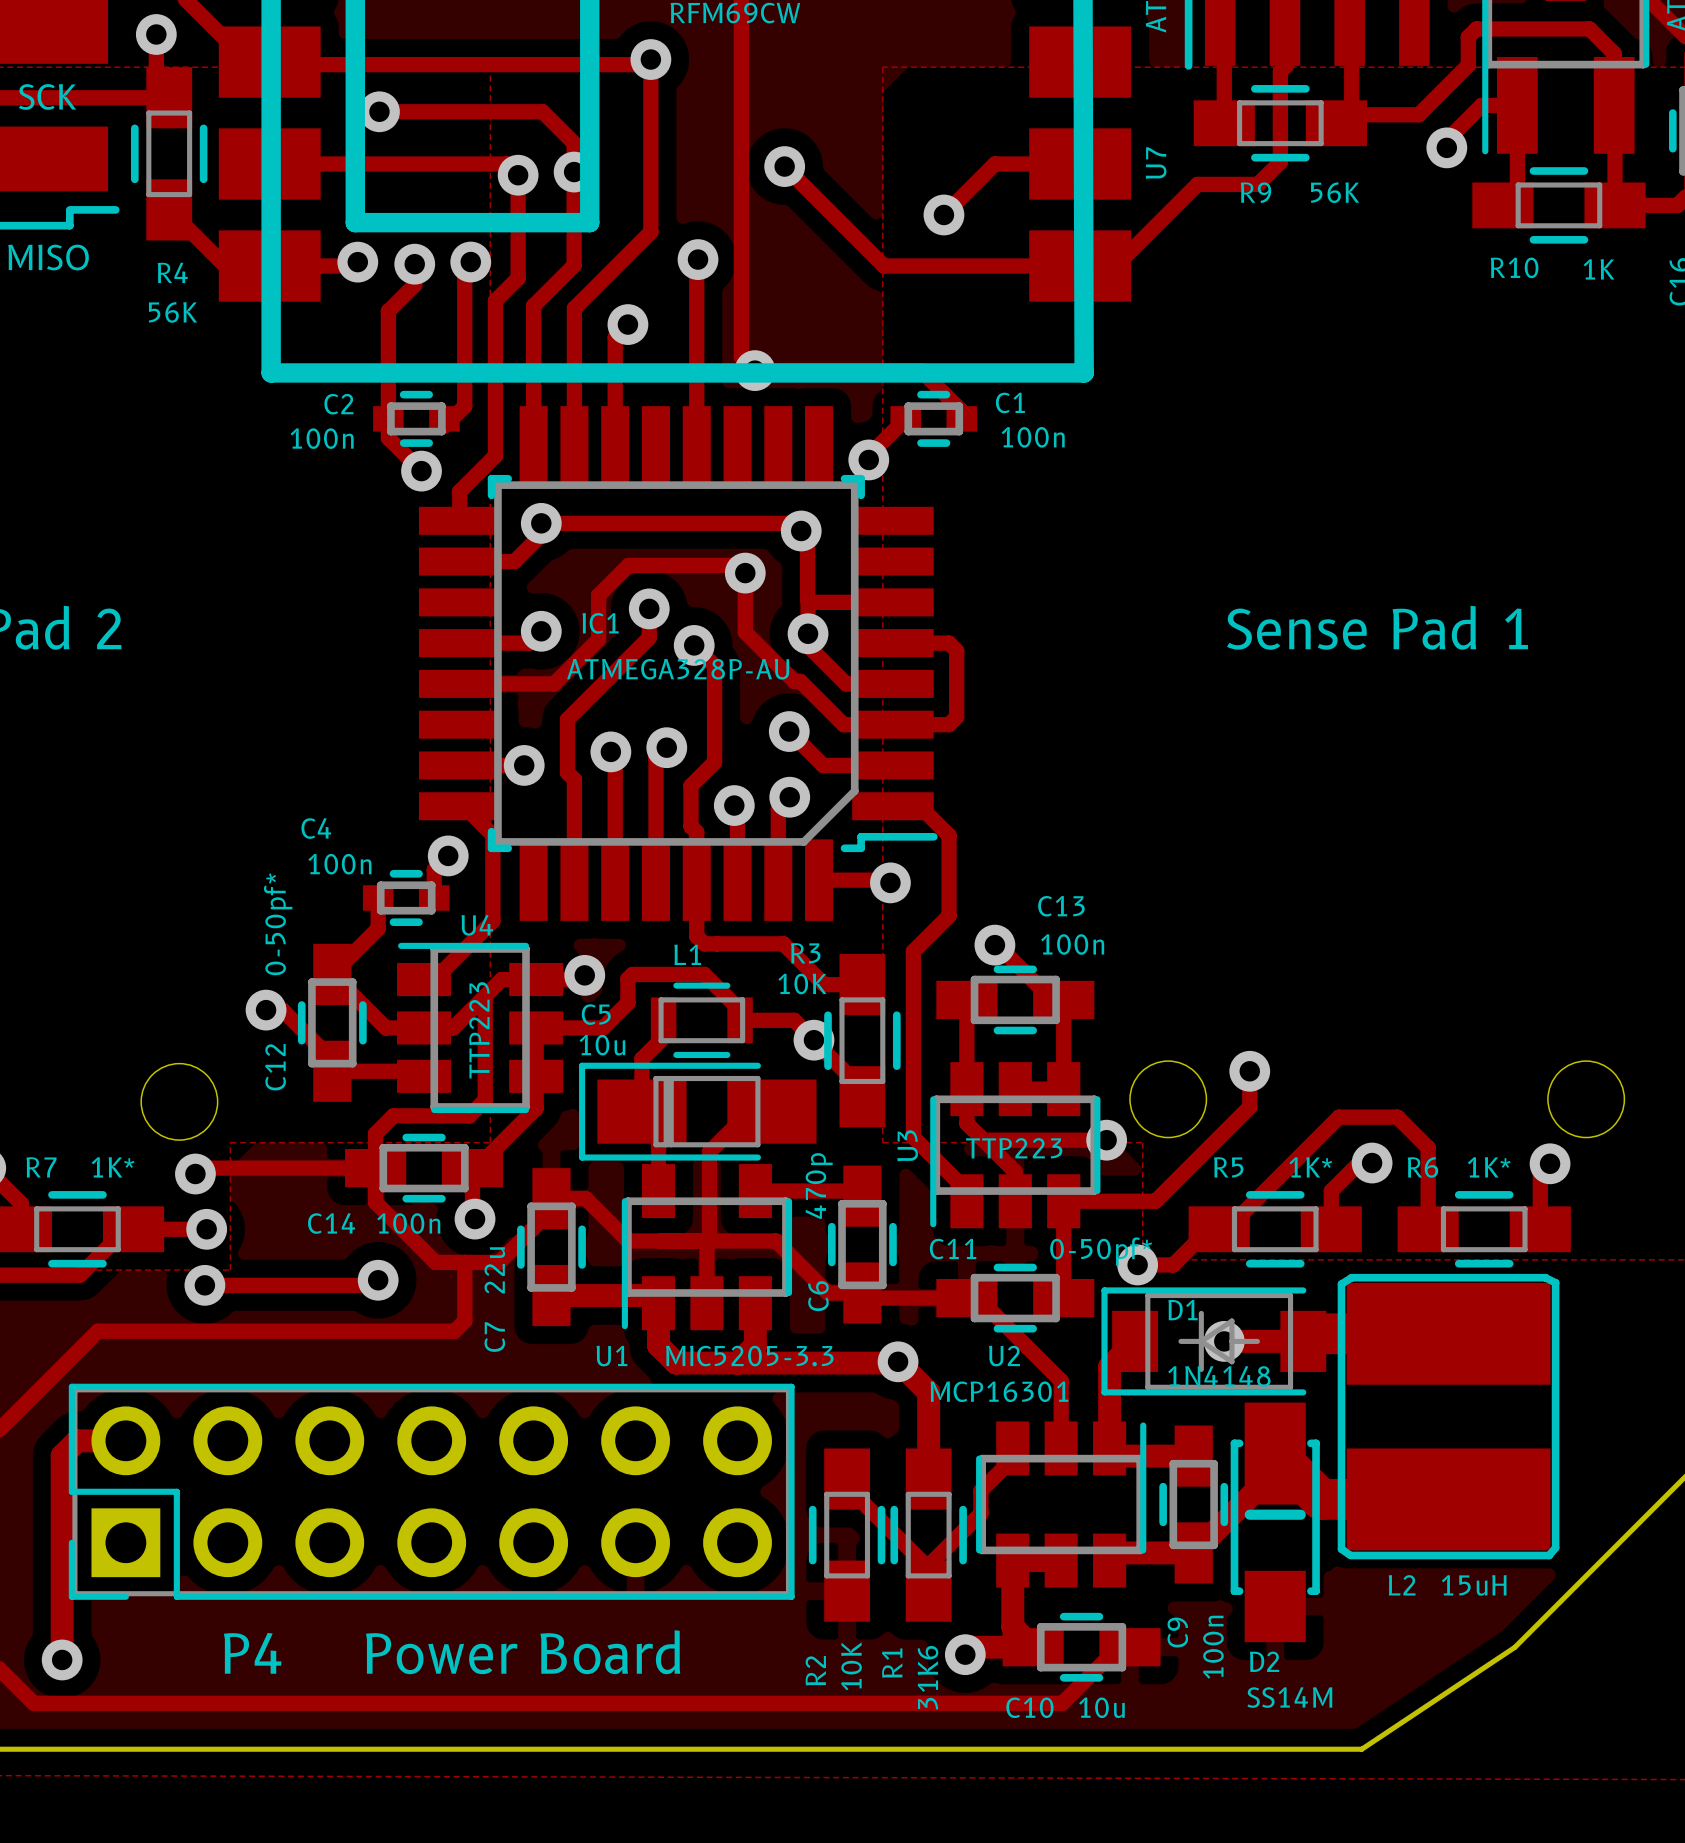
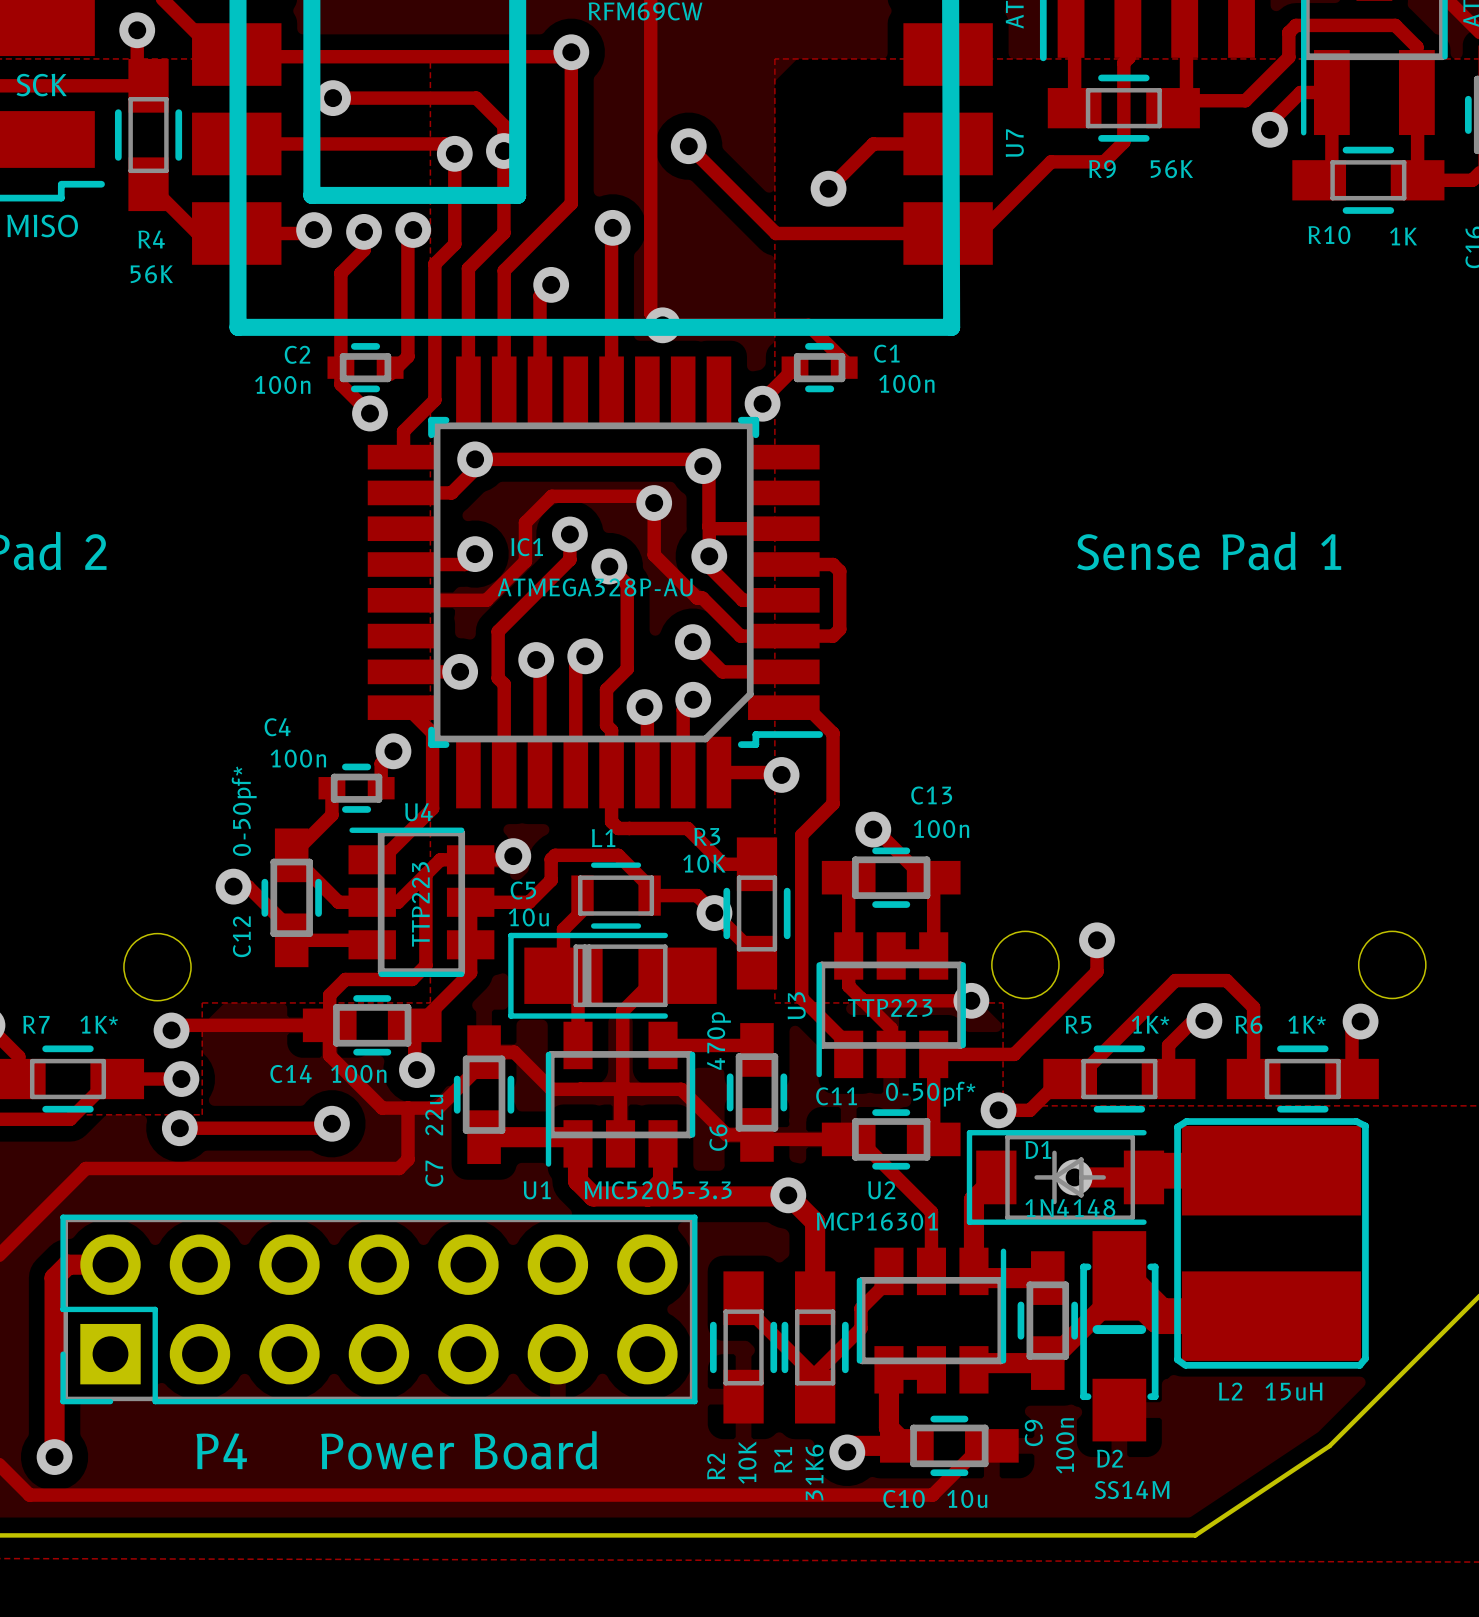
C11 value position: 0-50pf* (1101, 1251) -> 0-50pf* (930, 1094)

